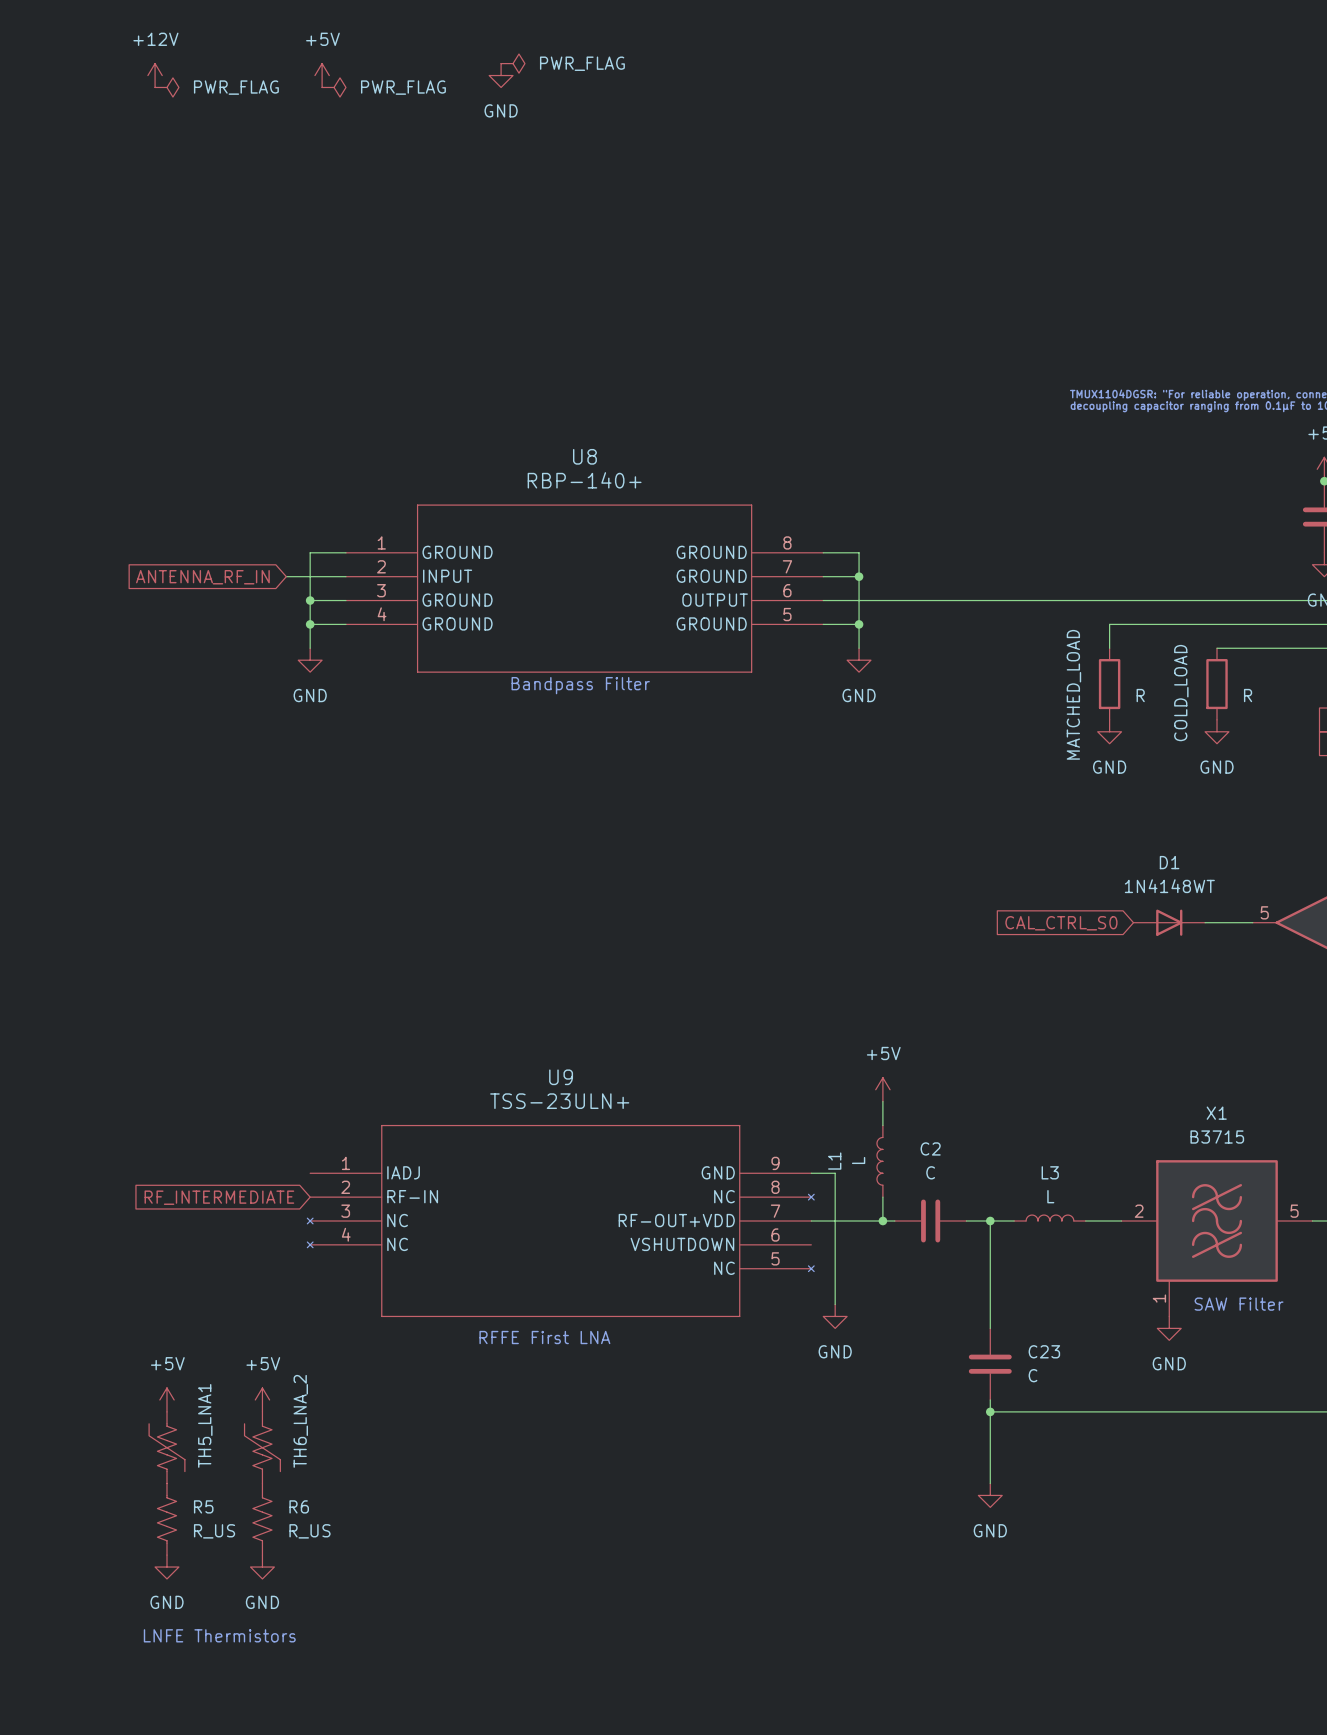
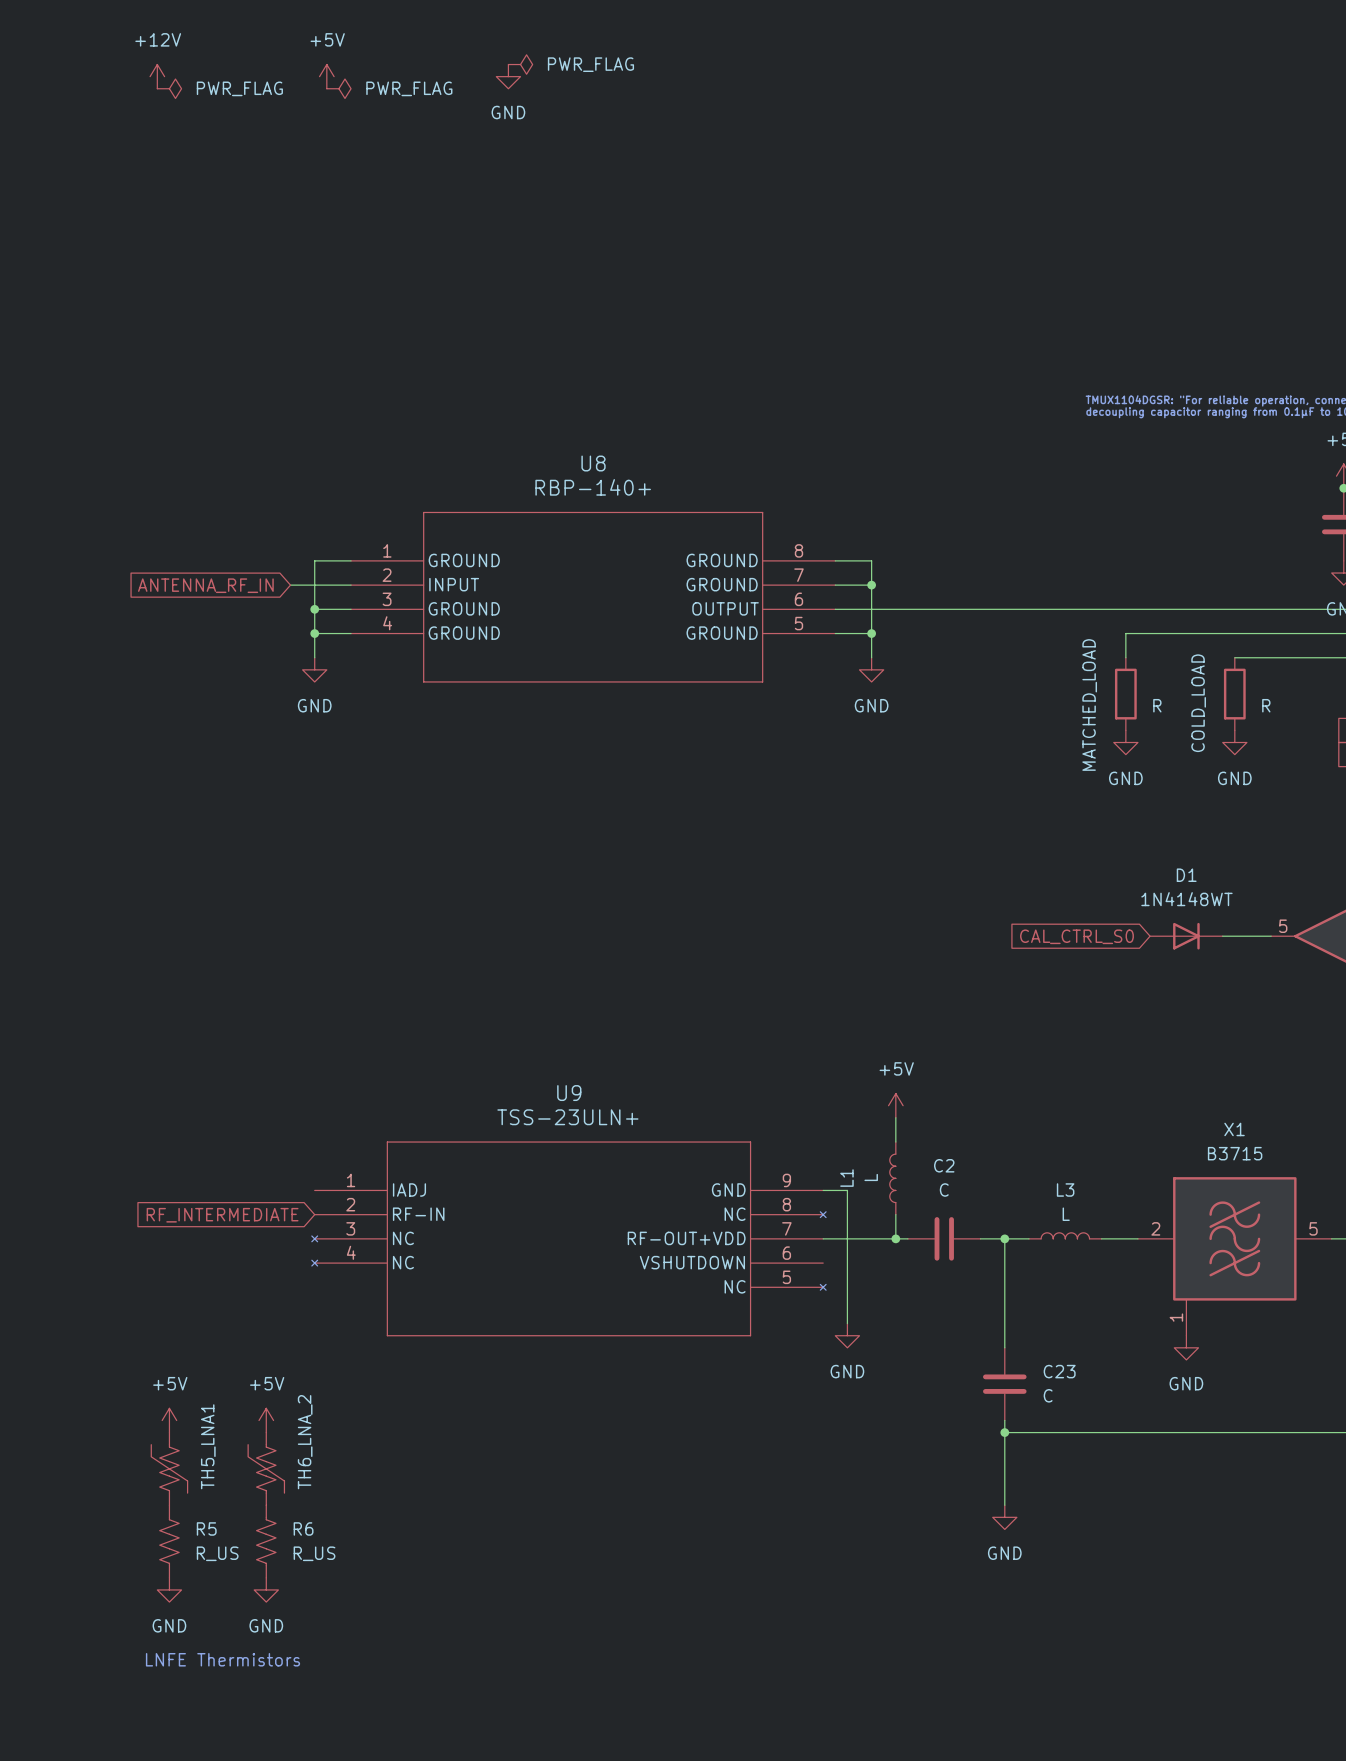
text: Bandpass Filter (580, 685) -> none
text: SAW Filter (1239, 1304) -> none
text: RFFE First LNA (544, 1337) -> none

